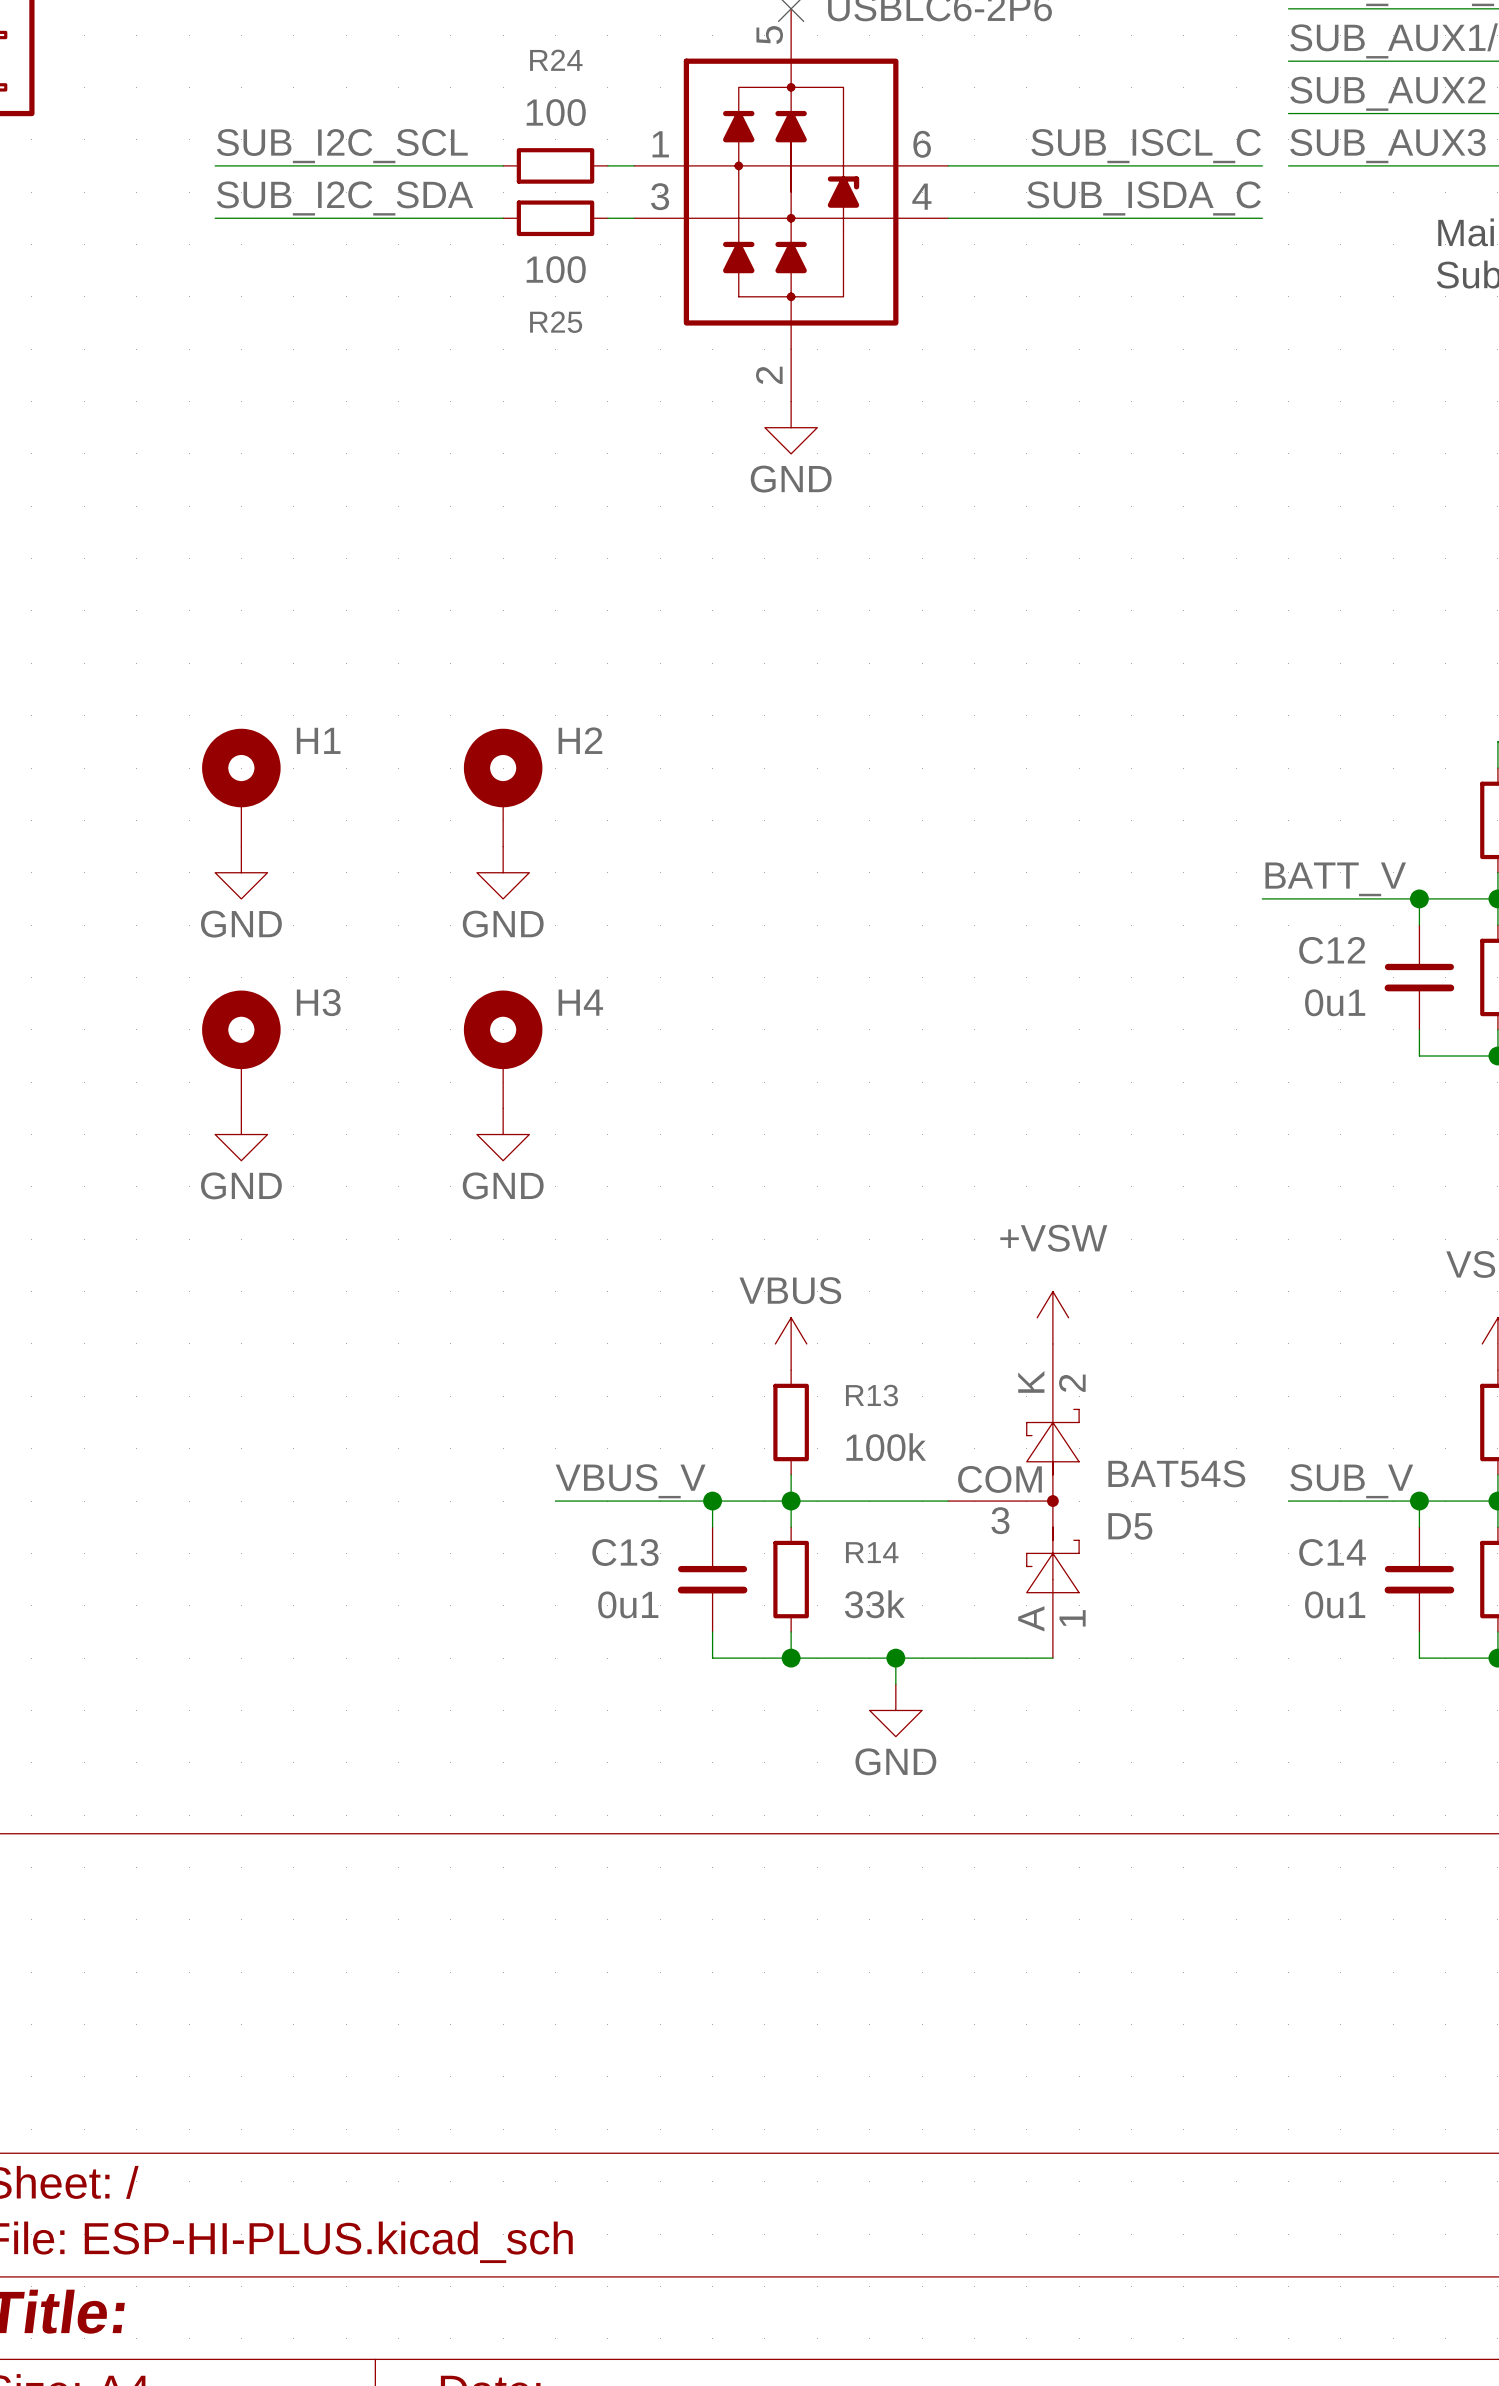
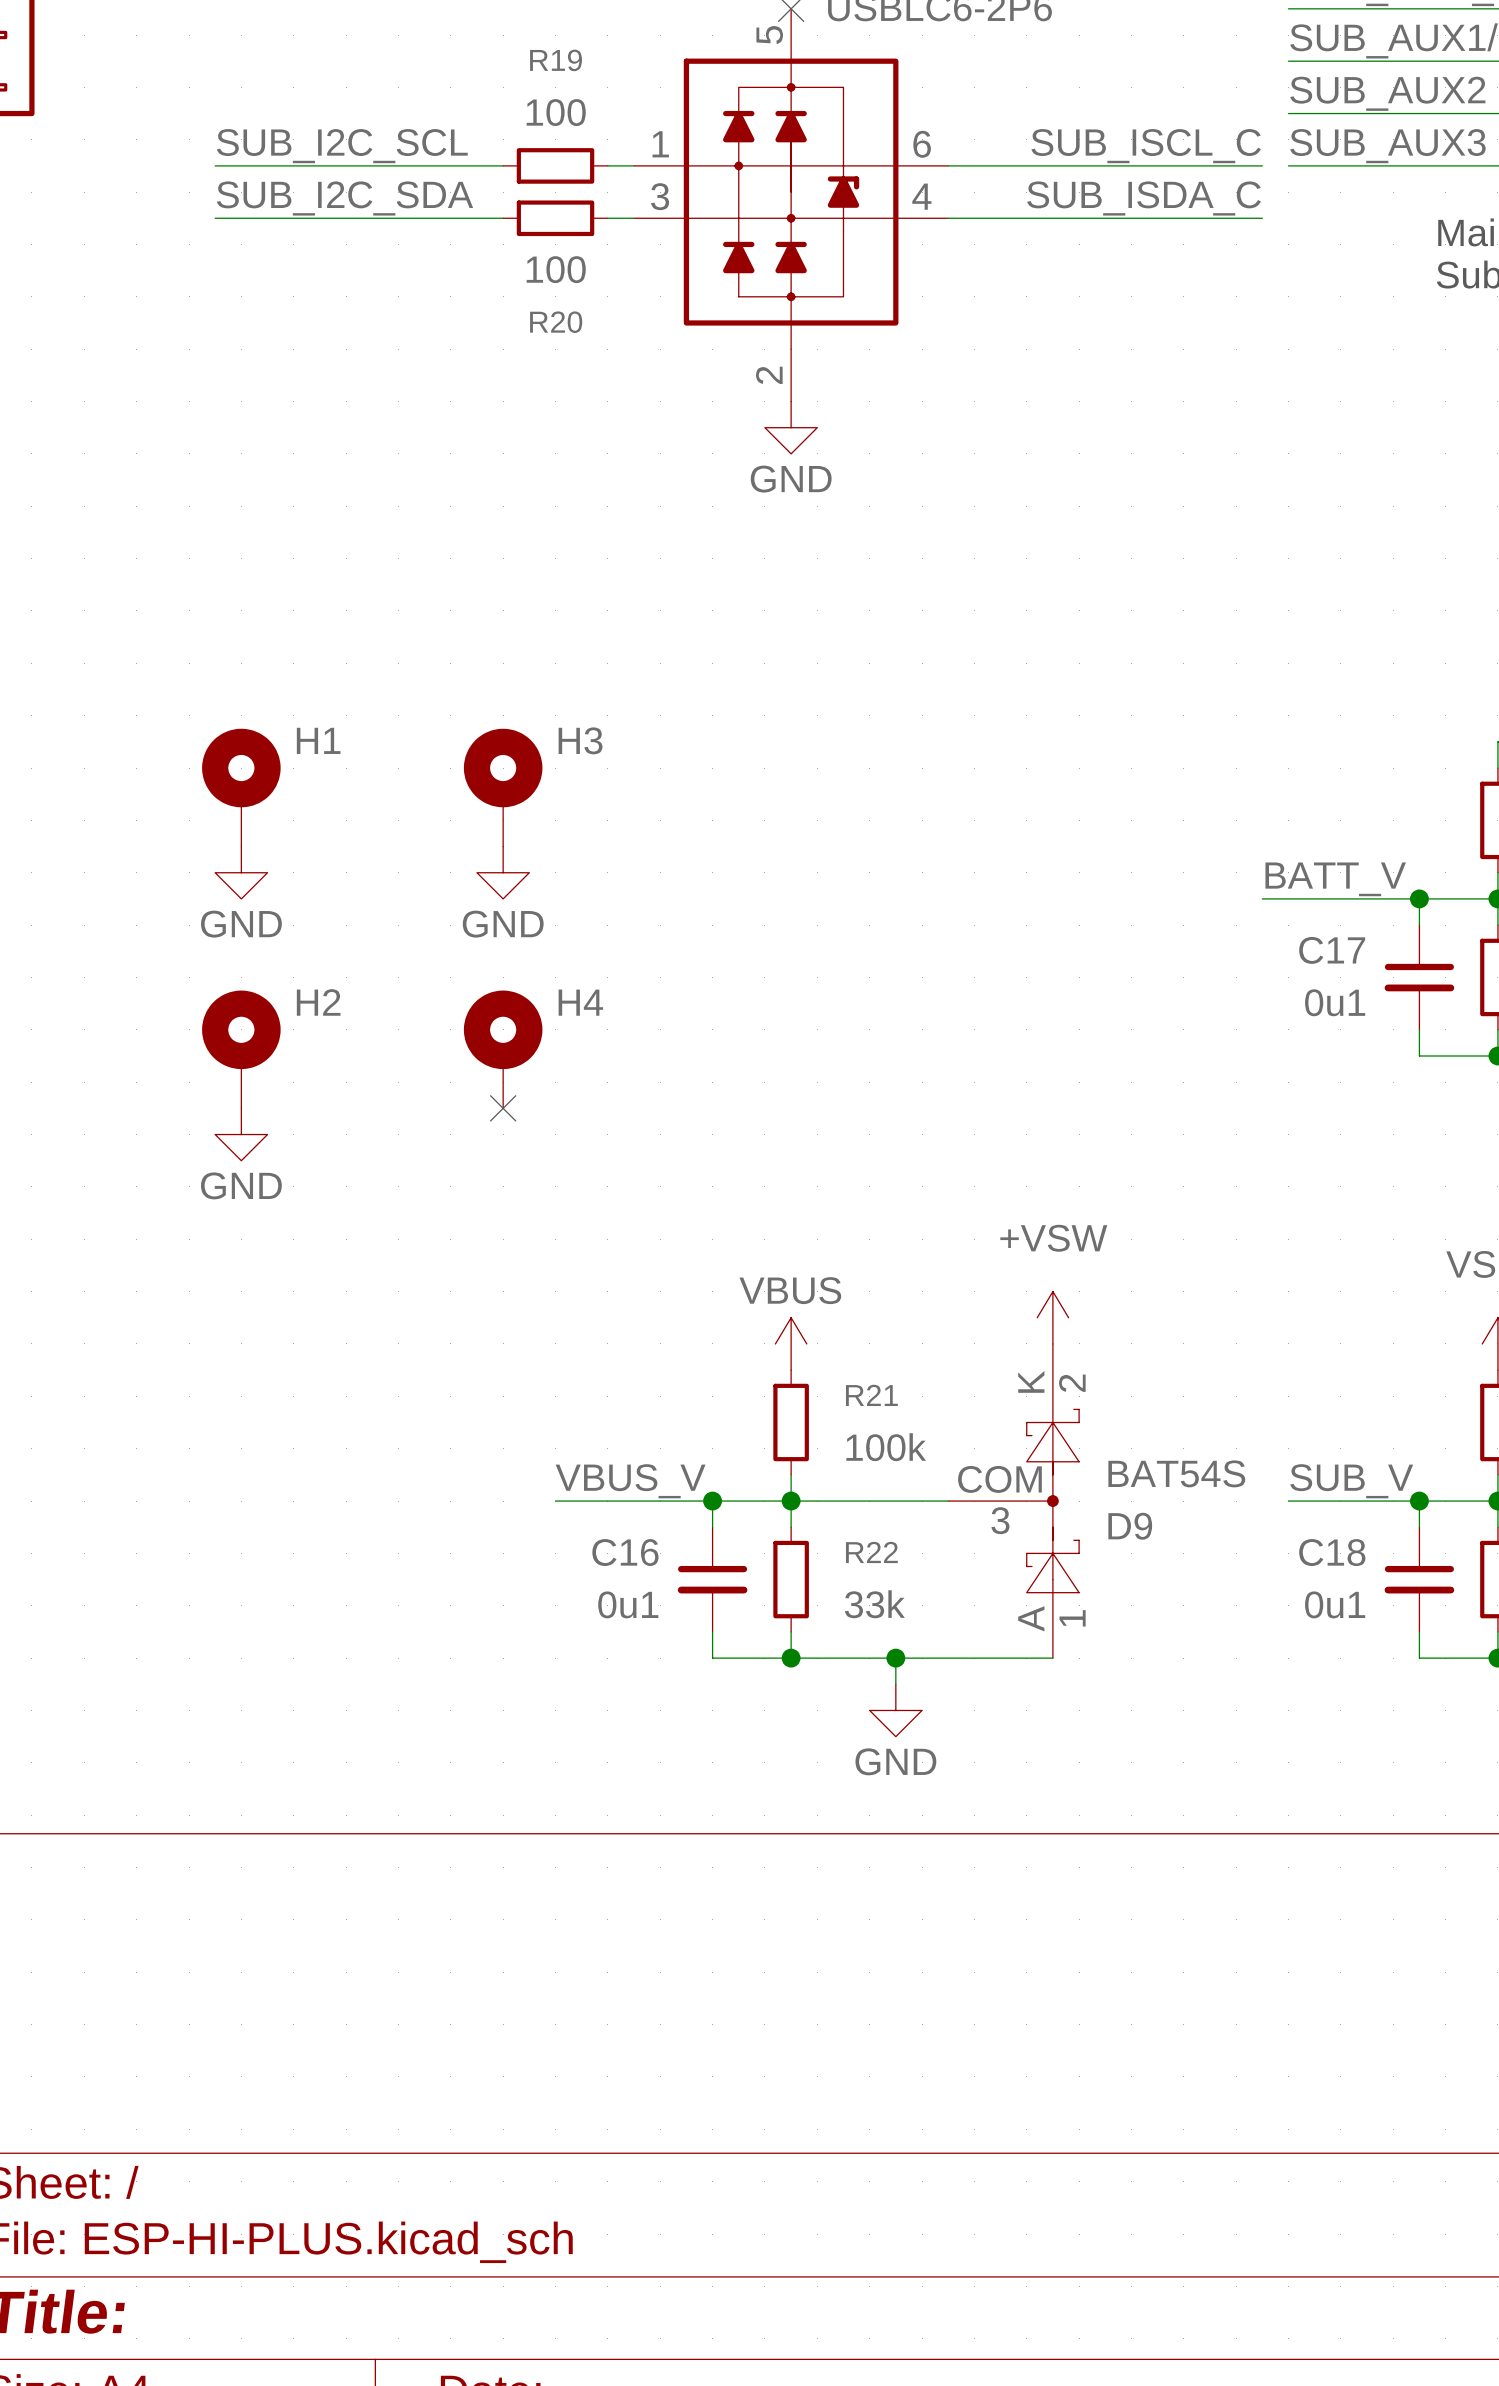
R24 name: R24 (556, 60) -> R19 (556, 60)
R25 name: R25 (556, 322) -> R20 (556, 322)
H2 name: H2 (580, 740) -> H3 (580, 740)
C12 name: C12 (1332, 950) -> C17 (1332, 950)
H3 name: H3 (318, 1002) -> H2 (318, 1002)
no-connect mark: none -> (503, 1108)
power symbol: GND (503, 1134) -> none
R13 name: R13 (871, 1395) -> R21 (871, 1395)
D5 name: D5 (1130, 1526) -> D9 (1130, 1526)
C13 name: C13 (625, 1552) -> C16 (625, 1552)
R14 name: R14 (872, 1552) -> R22 (871, 1552)
C14 name: C14 (1332, 1552) -> C18 (1332, 1552)

